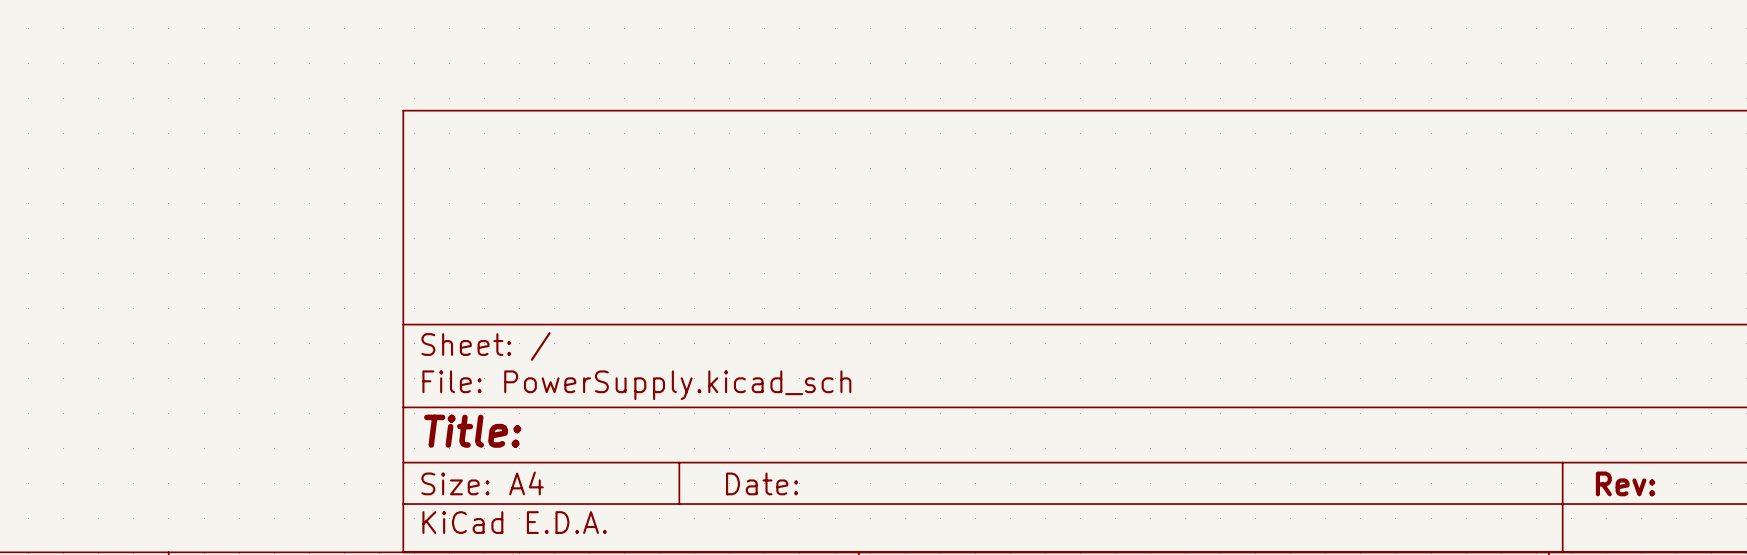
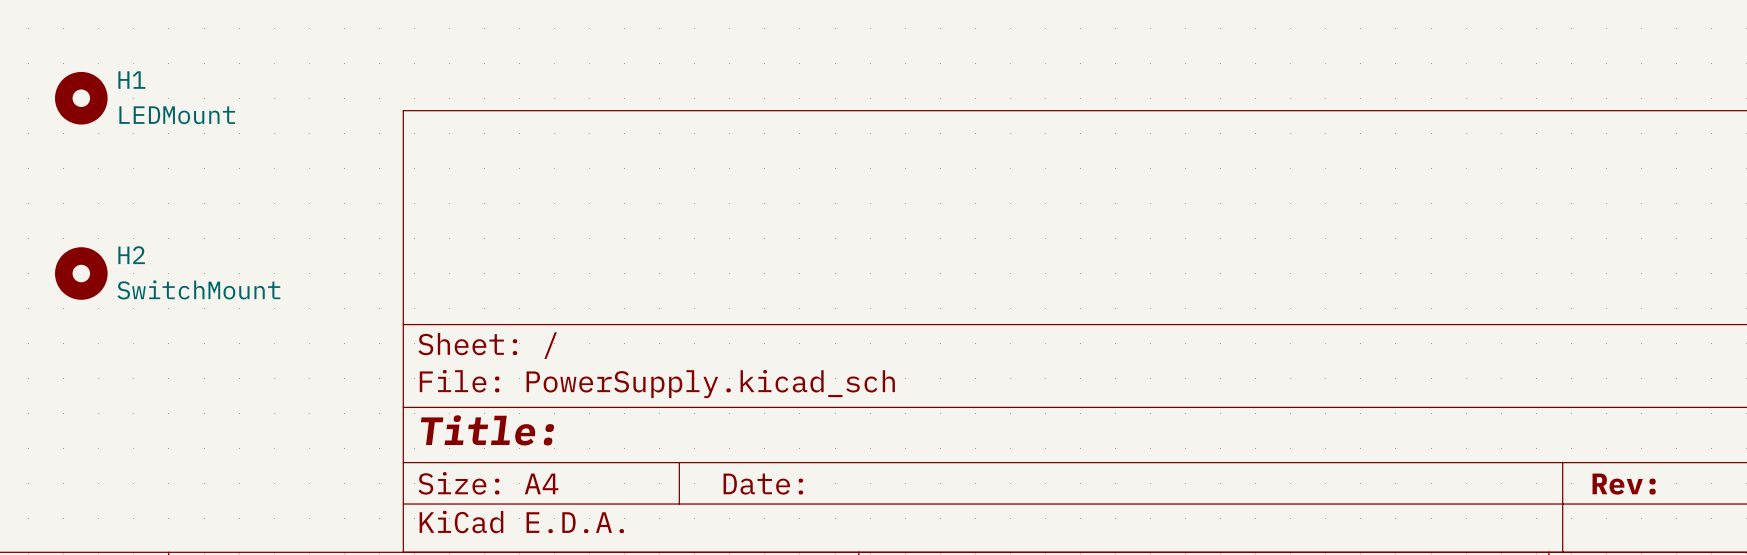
H1: none -> LEDMount (81, 98)
H2: none -> SwitchMount (81, 273)

